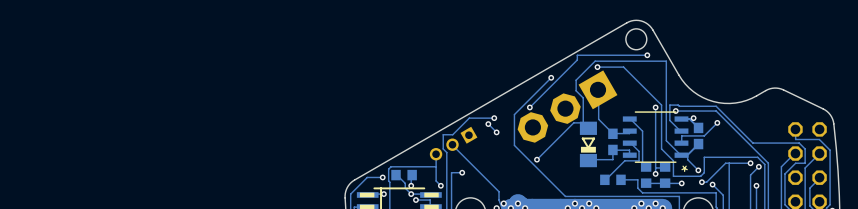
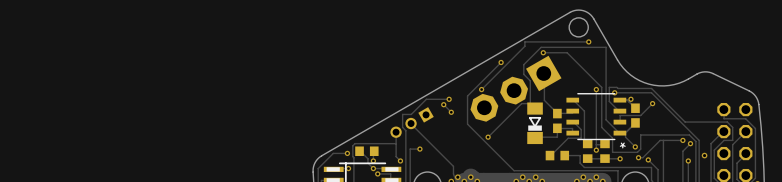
via: none -> (704, 155)

